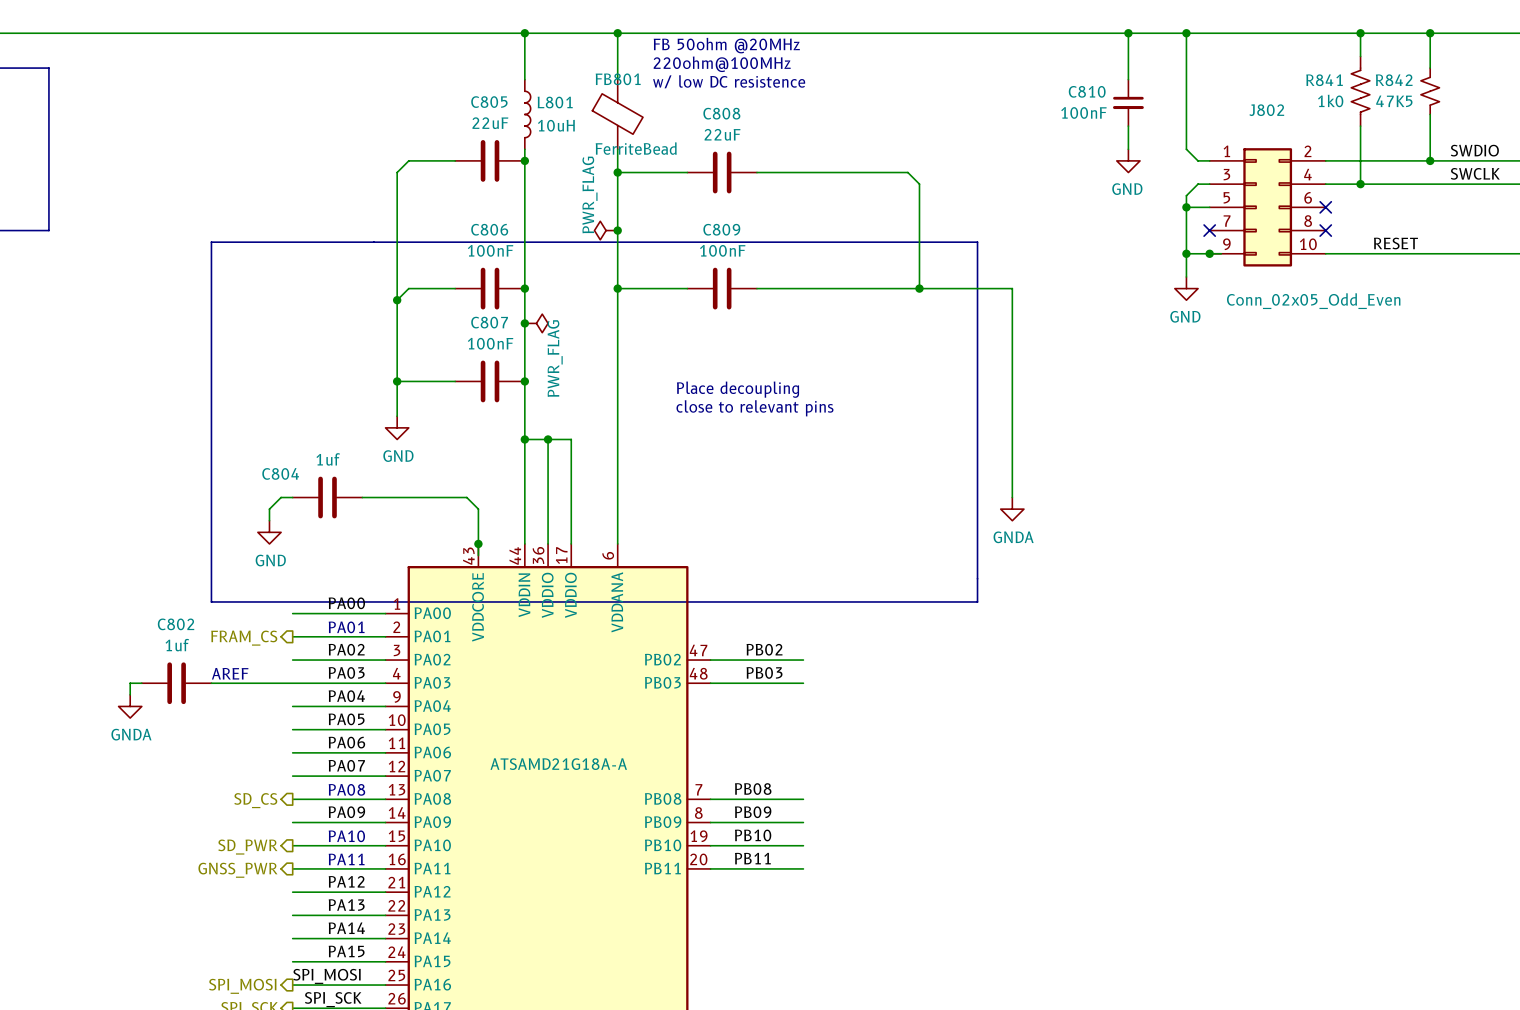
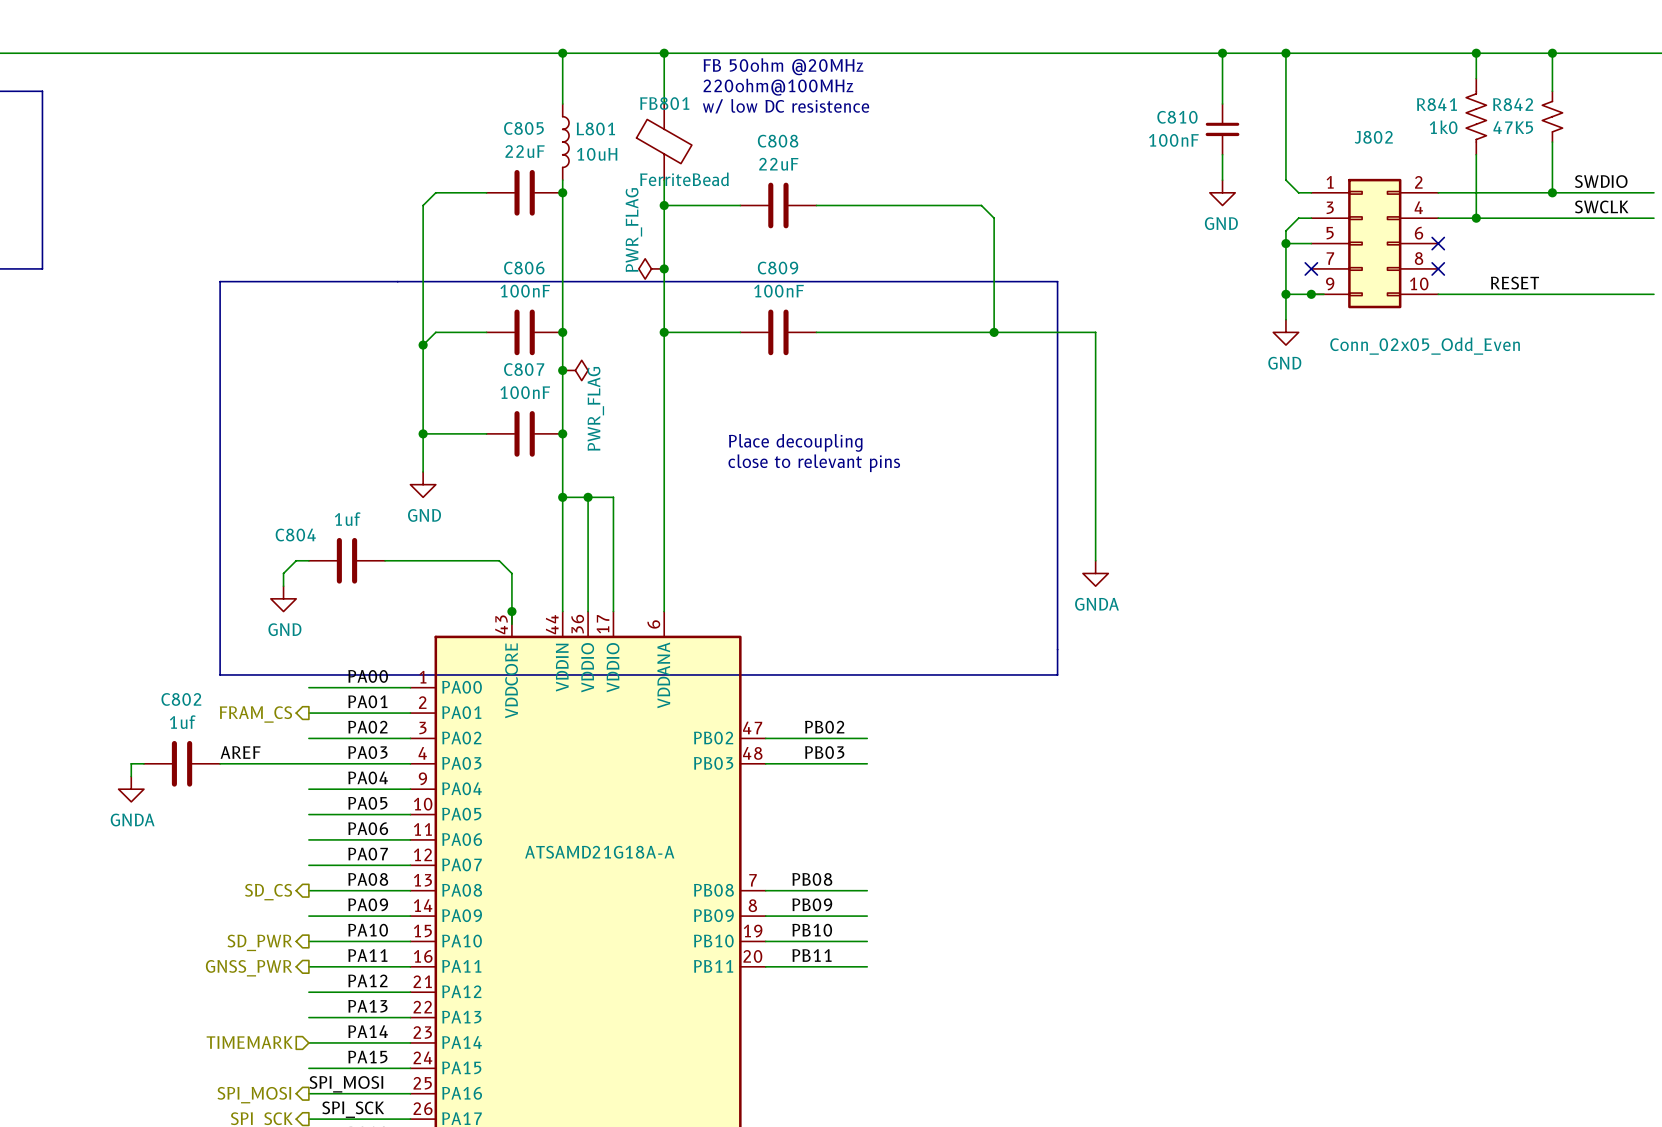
label: none -> PA01 (367, 701)
text: PA01 (346, 627) -> none
label: none -> AREF (240, 752)
text: AREF (230, 673) -> none
text: PA08 (346, 789) -> none
label: none -> PA08 (368, 879)
label: none -> PA10 (368, 930)
text: PA10 (346, 836) -> none
label: none -> PA11 (367, 955)
text: PA11 (346, 859) -> none
hierarchical label: none -> TIMEMARK (249, 1042)

